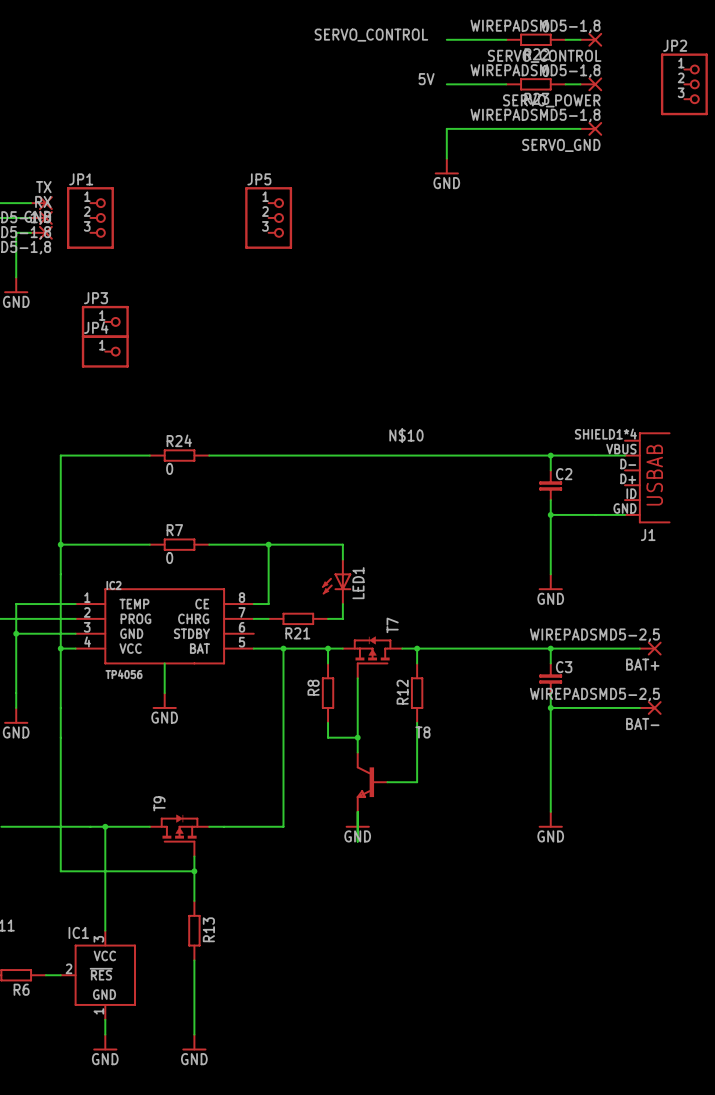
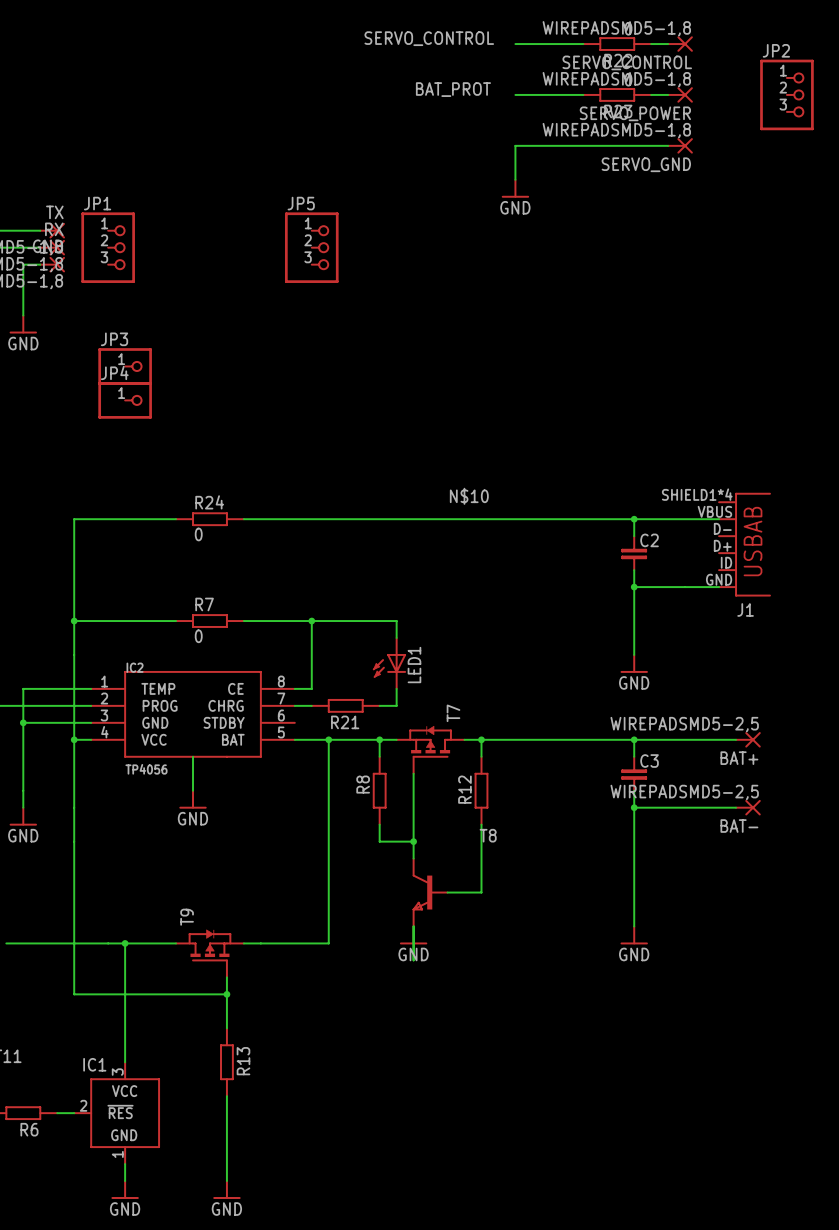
label: none -> BAT_PROT (453, 89)
label: 5V (426, 79) -> none

